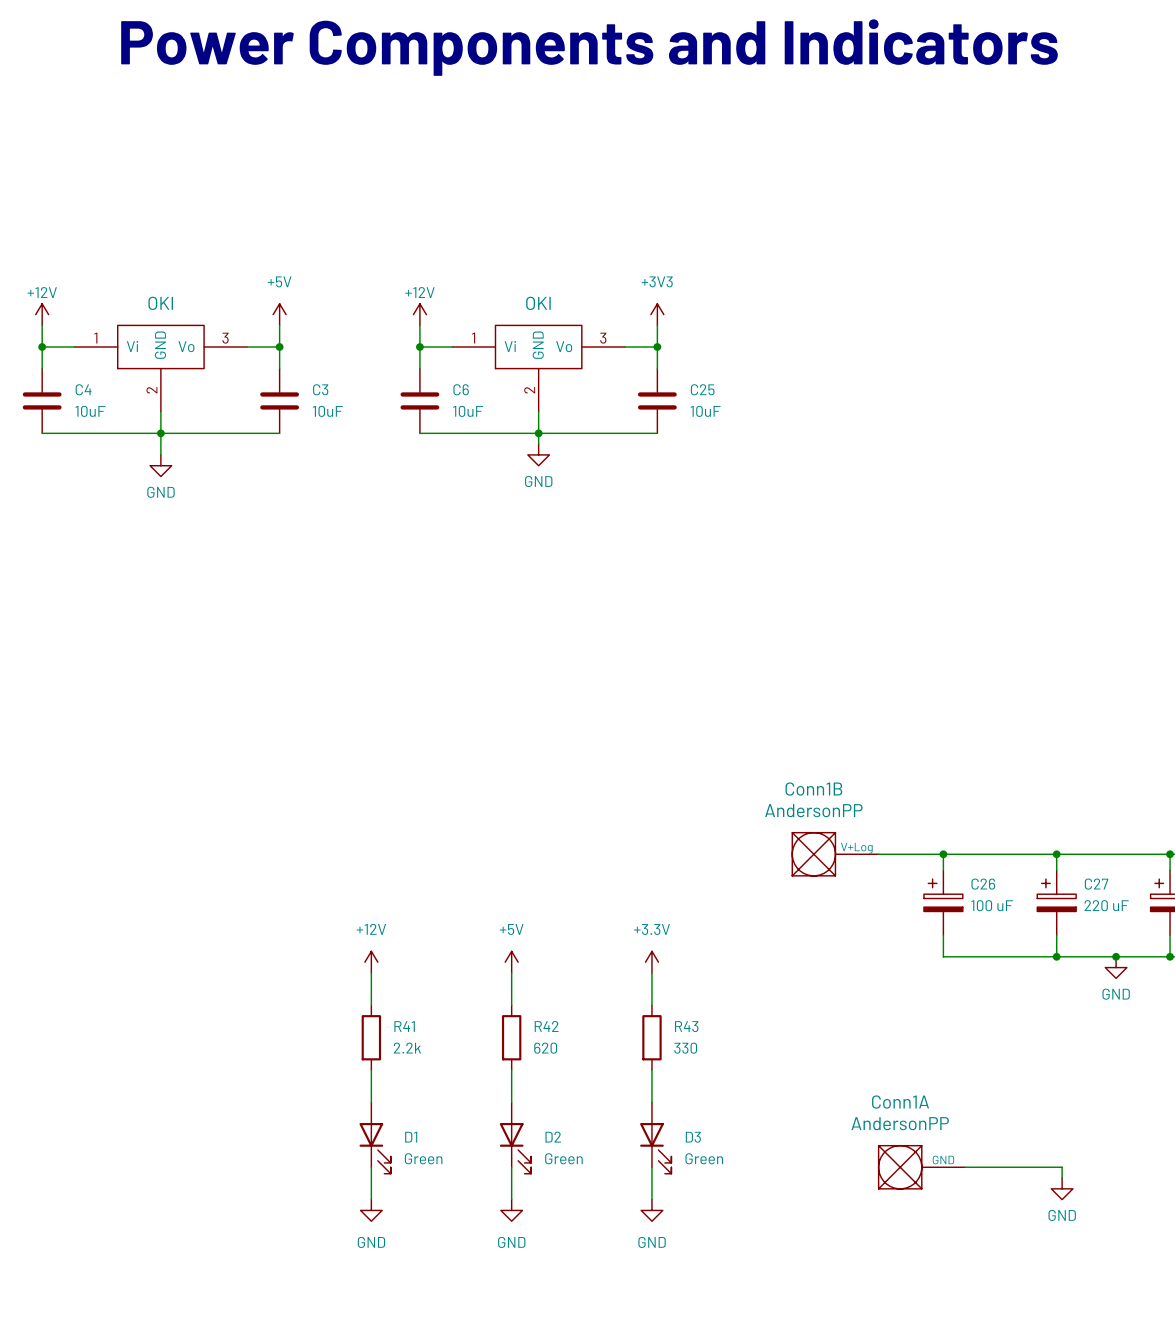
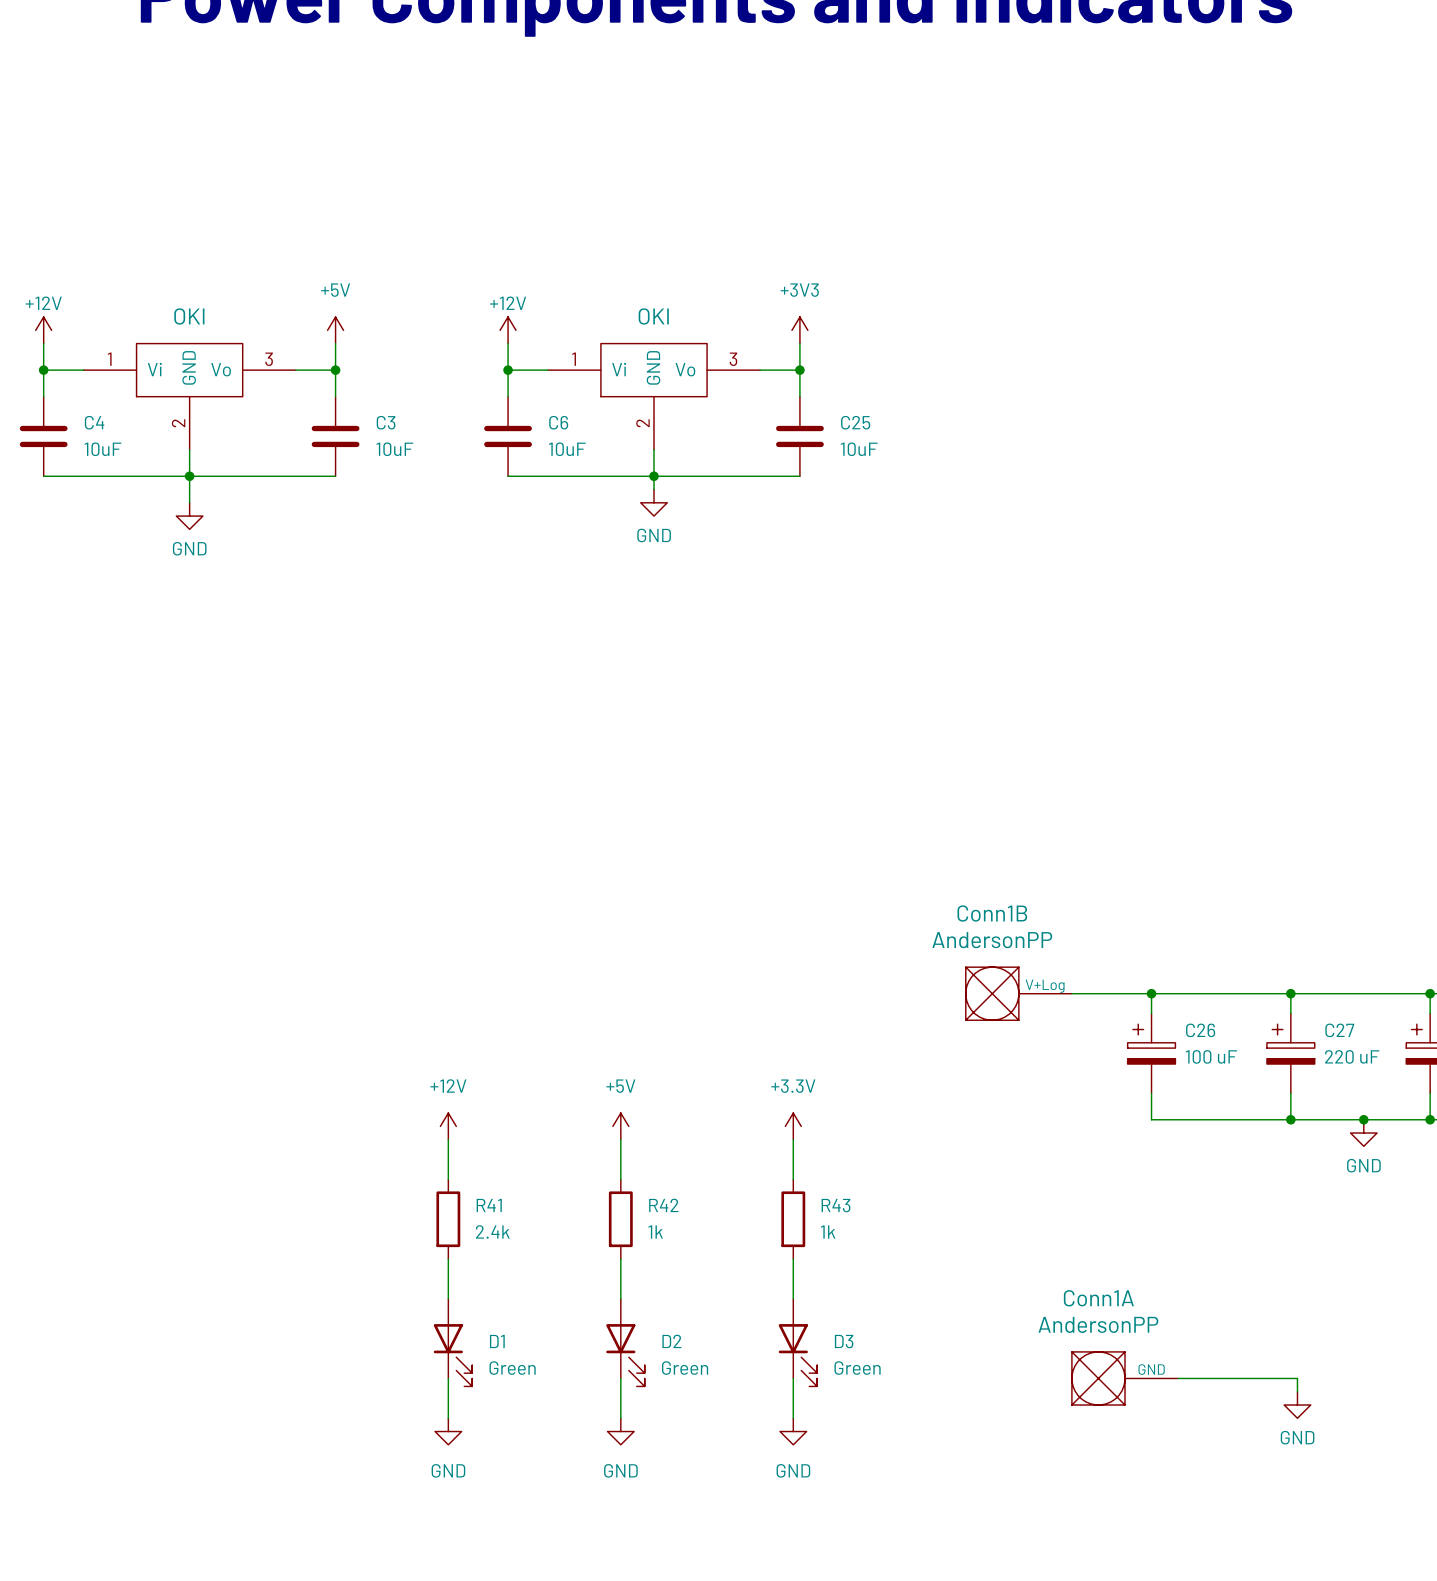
R41 value: 2.2k (407, 1048) -> 2.4k (492, 1231)
R42 value: 620 (545, 1048) -> 1k (655, 1232)
R43 value: 330 (685, 1048) -> 1k (828, 1232)

